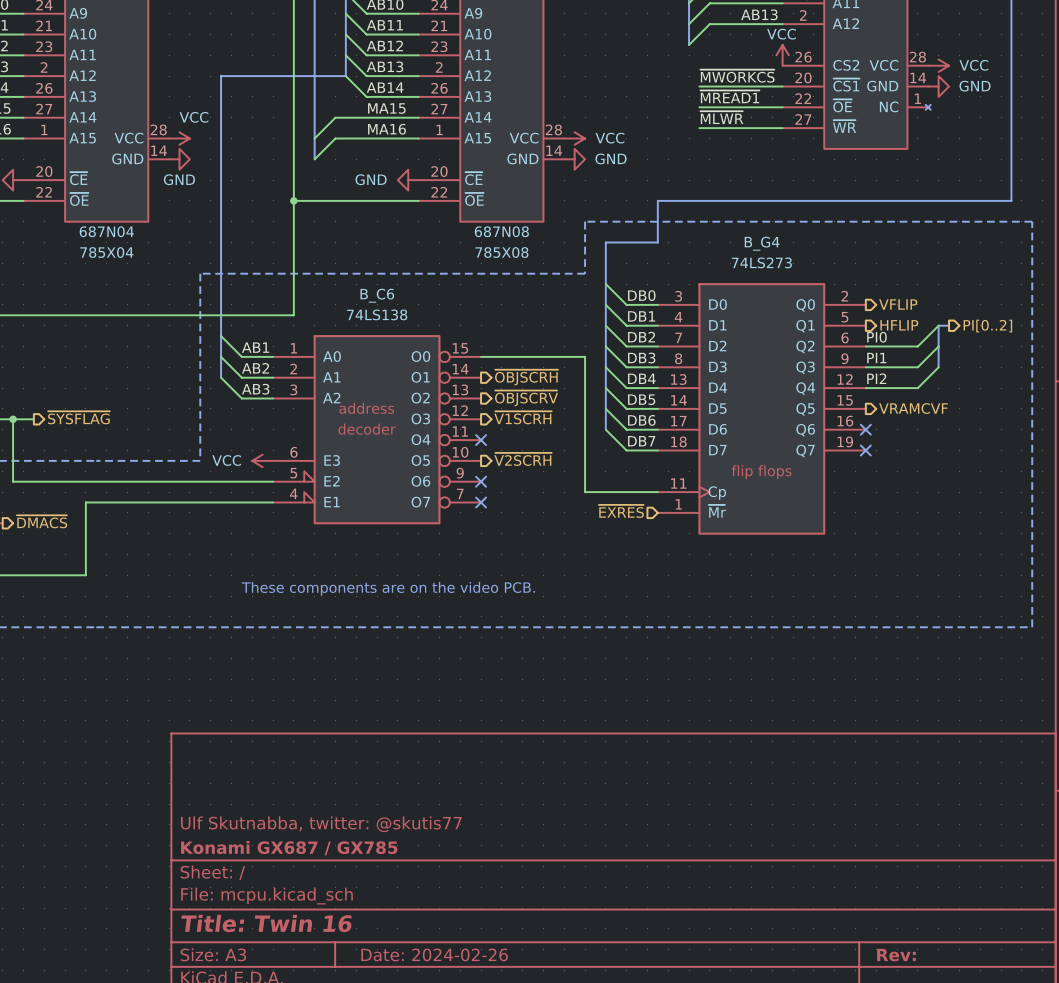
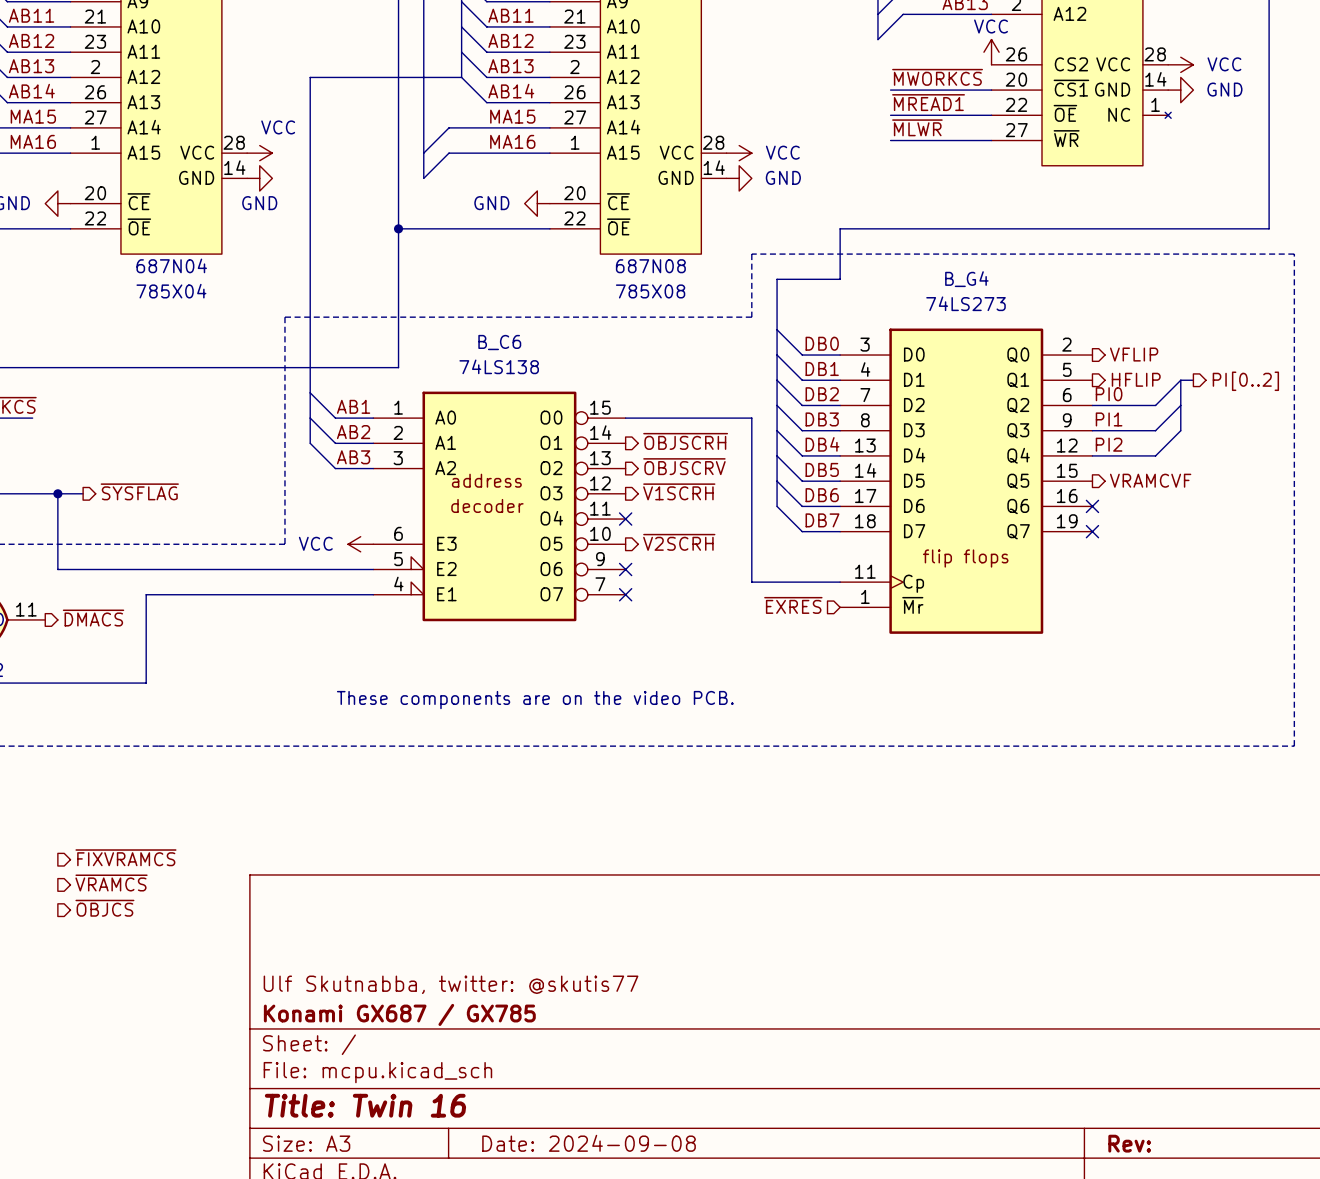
hierarchical label: none -> ~{FIXVRAMCS} (125, 857)
hierarchical label: none -> ~{VRAMCS} (111, 883)
hierarchical label: none -> ~{OBJCS} (104, 908)
title block: Date: 2024-02-26 (434, 954) -> Date: 2024-09-08 (589, 1143)

